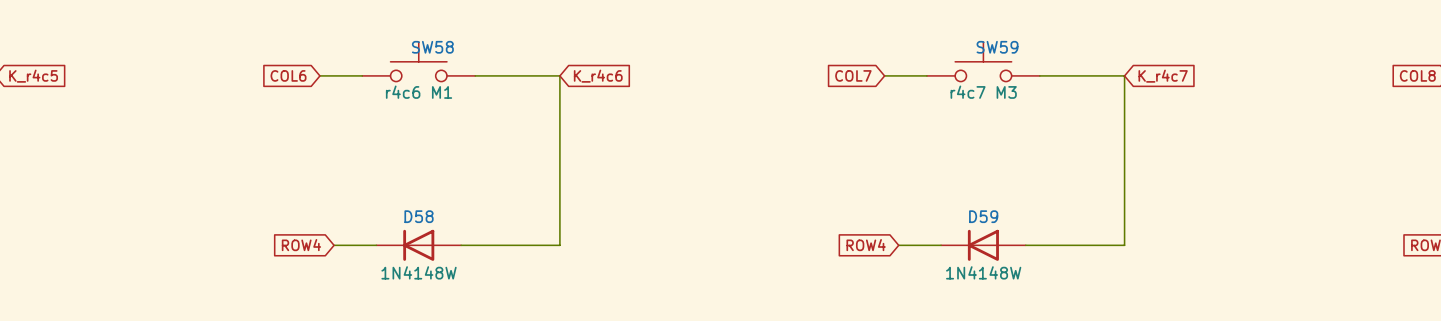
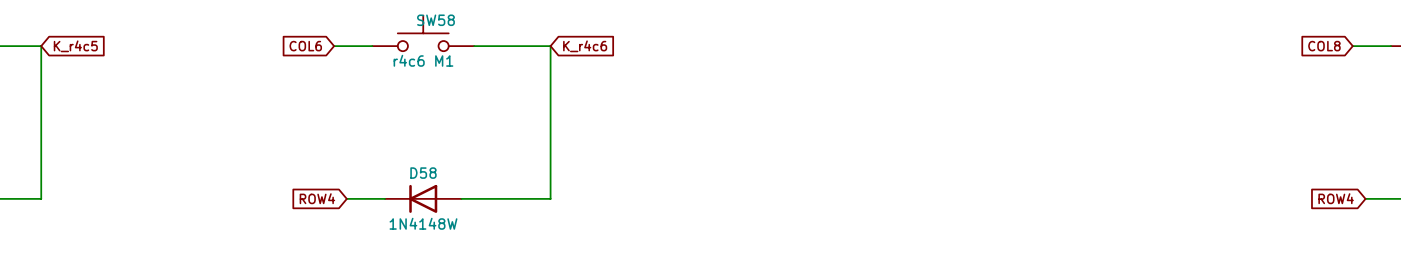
SW59: r4c7 M3 (983, 61) -> none
global label: COL7 (853, 75) -> none
wire: (884, 75) (926, 75) -> none
wire: (1039, 75) (1124, 75) (1124, 245) (1025, 245) -> none
global label: K_r4c7 (1163, 76) -> none
global label: ROW4 (866, 245) -> none
wire: (898, 245) (941, 245) -> none
D59: 1N4148W (983, 245) -> none

